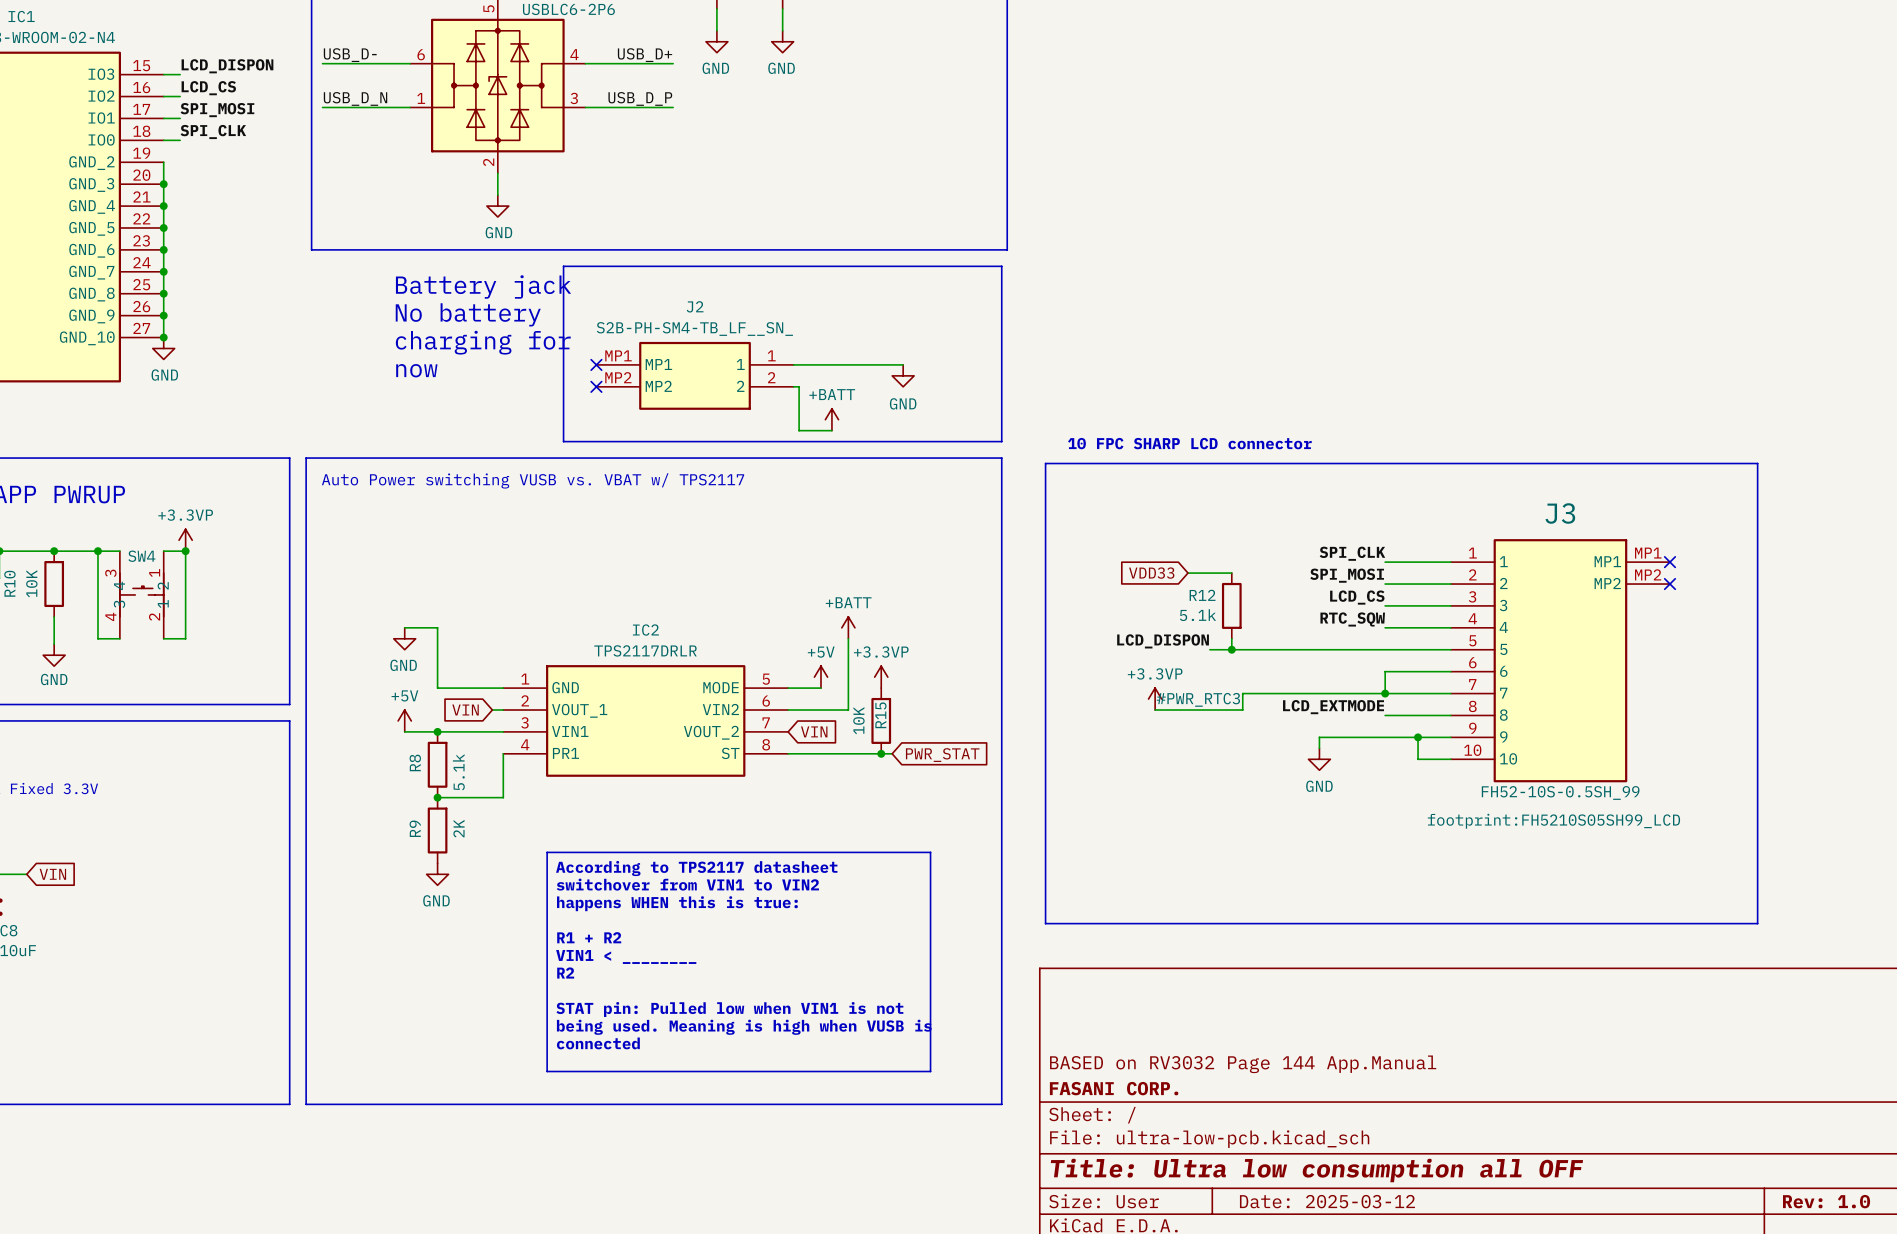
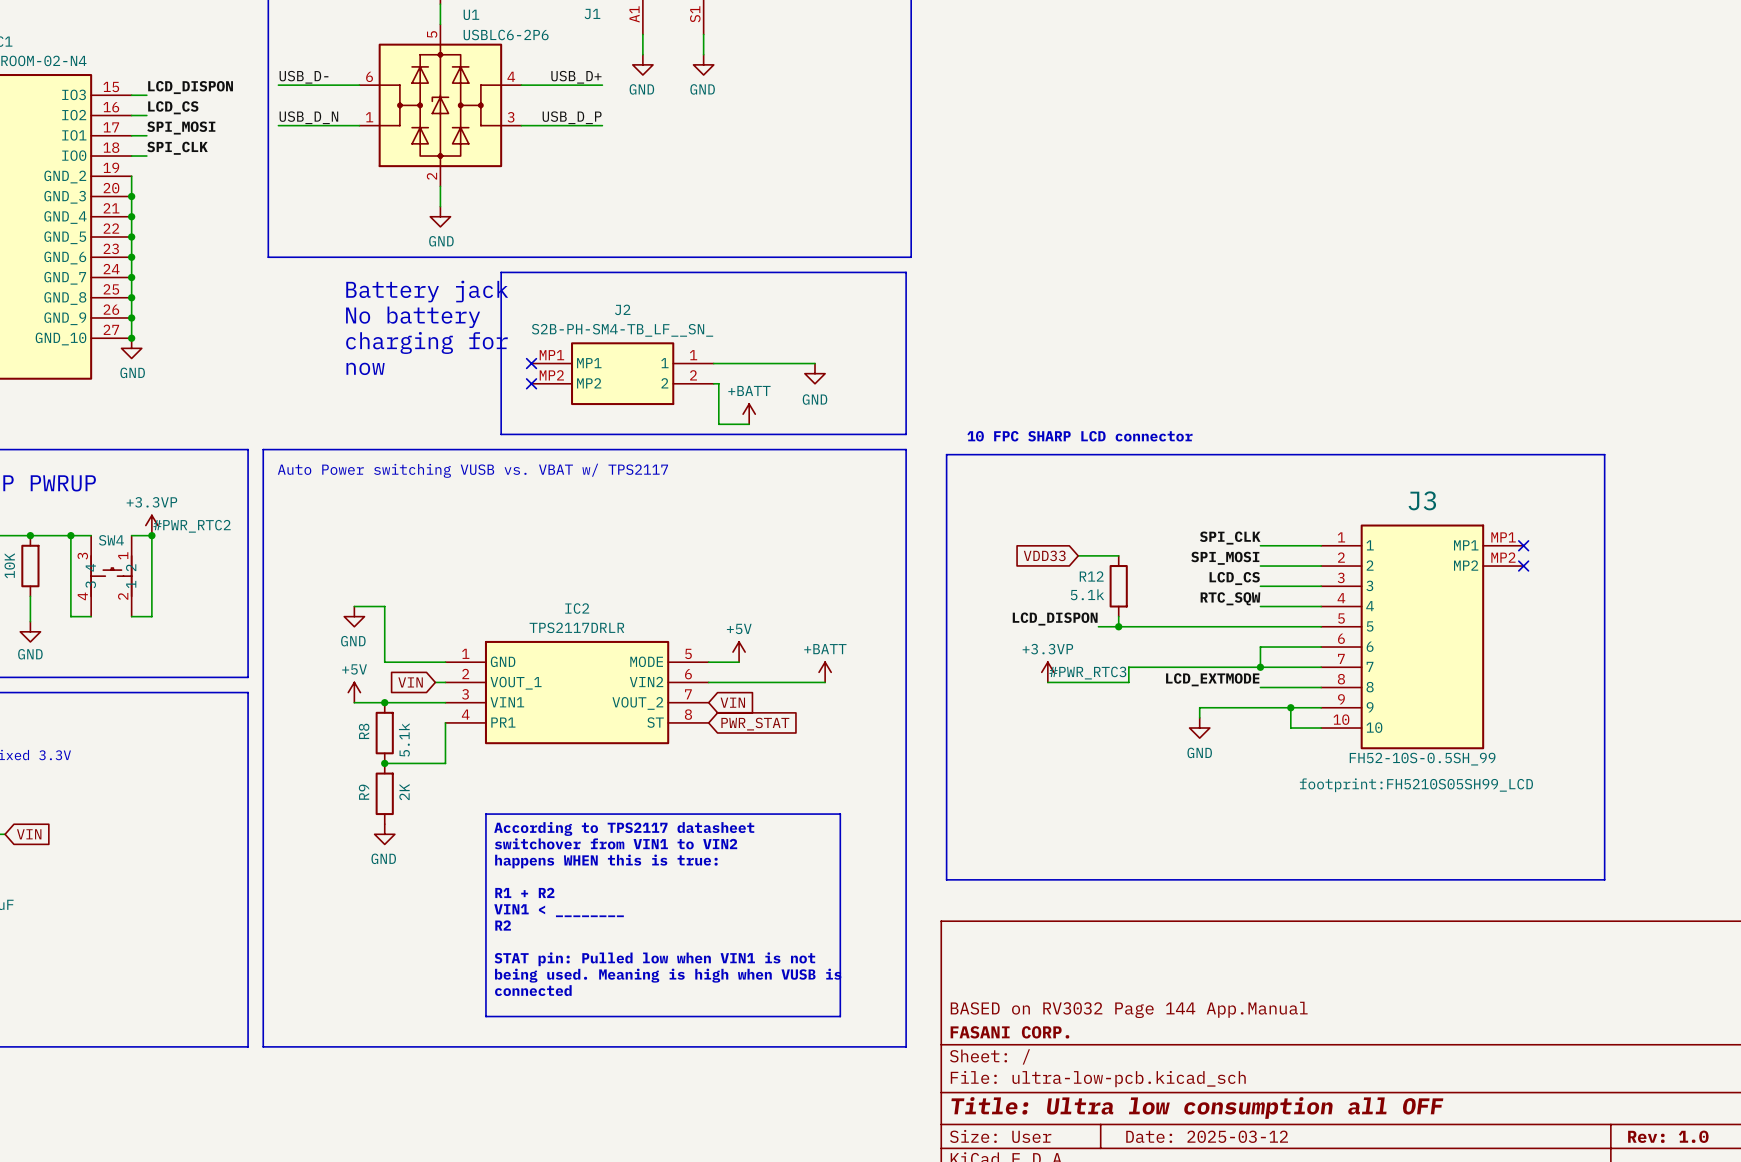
#PWR_RTC2 name: none -> #PWR_RTC2 (192, 526)
power symbol position: +BATT (848, 627) -> +BATT (825, 672)
wire: (848, 638) (848, 710) -> (825, 682) (764, 682)
power symbol: +3.3VP (881, 677) -> none
R15: 10K (881, 720) -> none
wire: (788, 753) (892, 753) -> none
junction: (881, 753) -> none
global label position: PWR_STAT (942, 755) -> PWR_STAT (755, 724)

